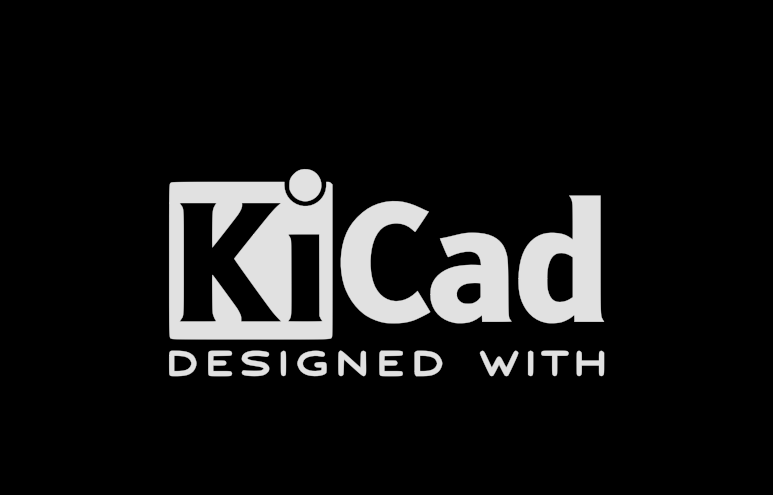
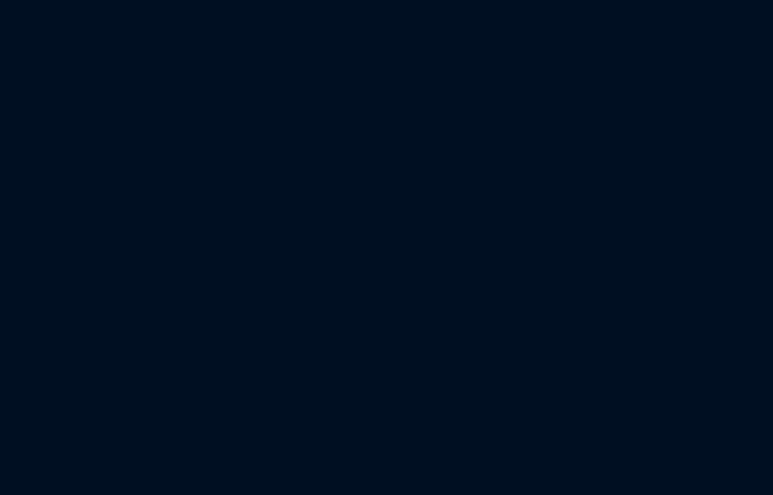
drawing: [168, 168, 605, 377] -> none

